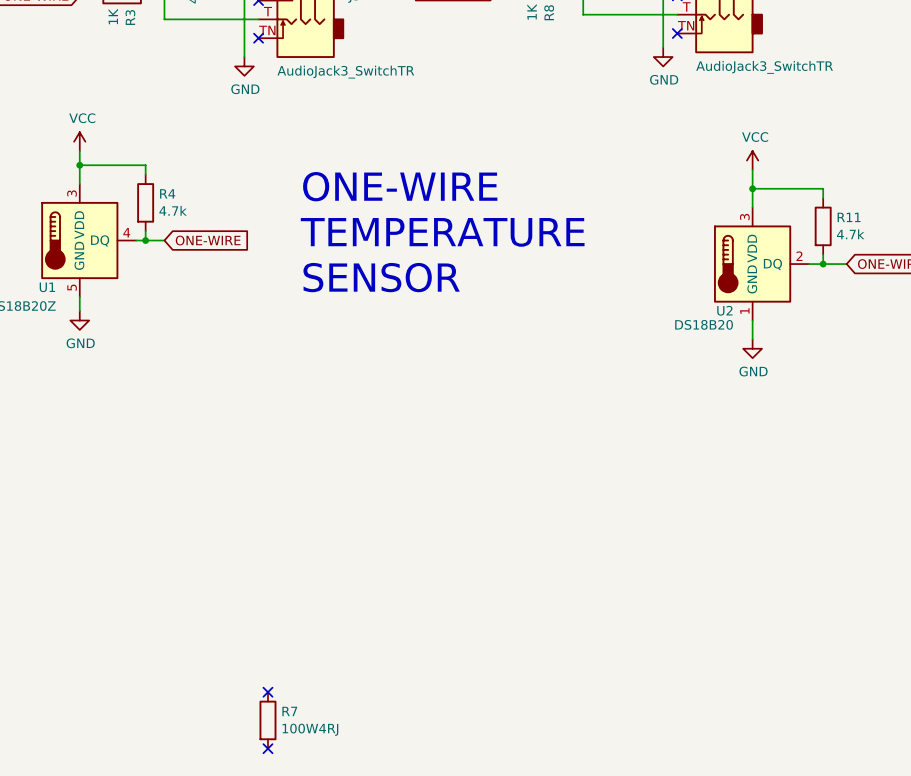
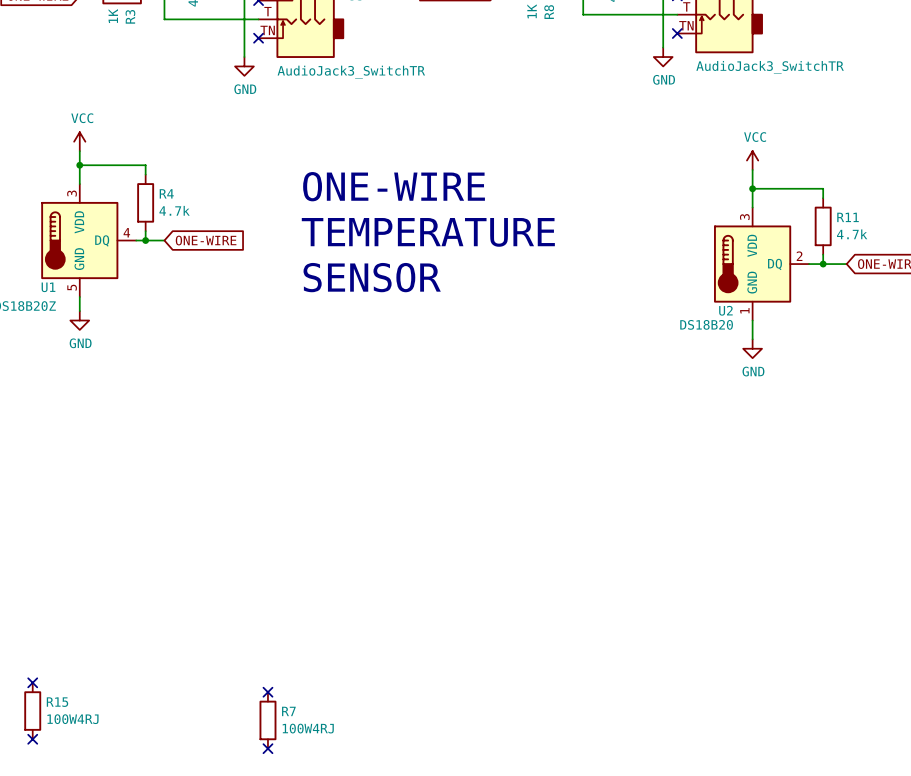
no-connect mark: none -> (32, 682)
R15: none -> 100W4RJ (32, 711)
no-connect mark: none -> (32, 739)

